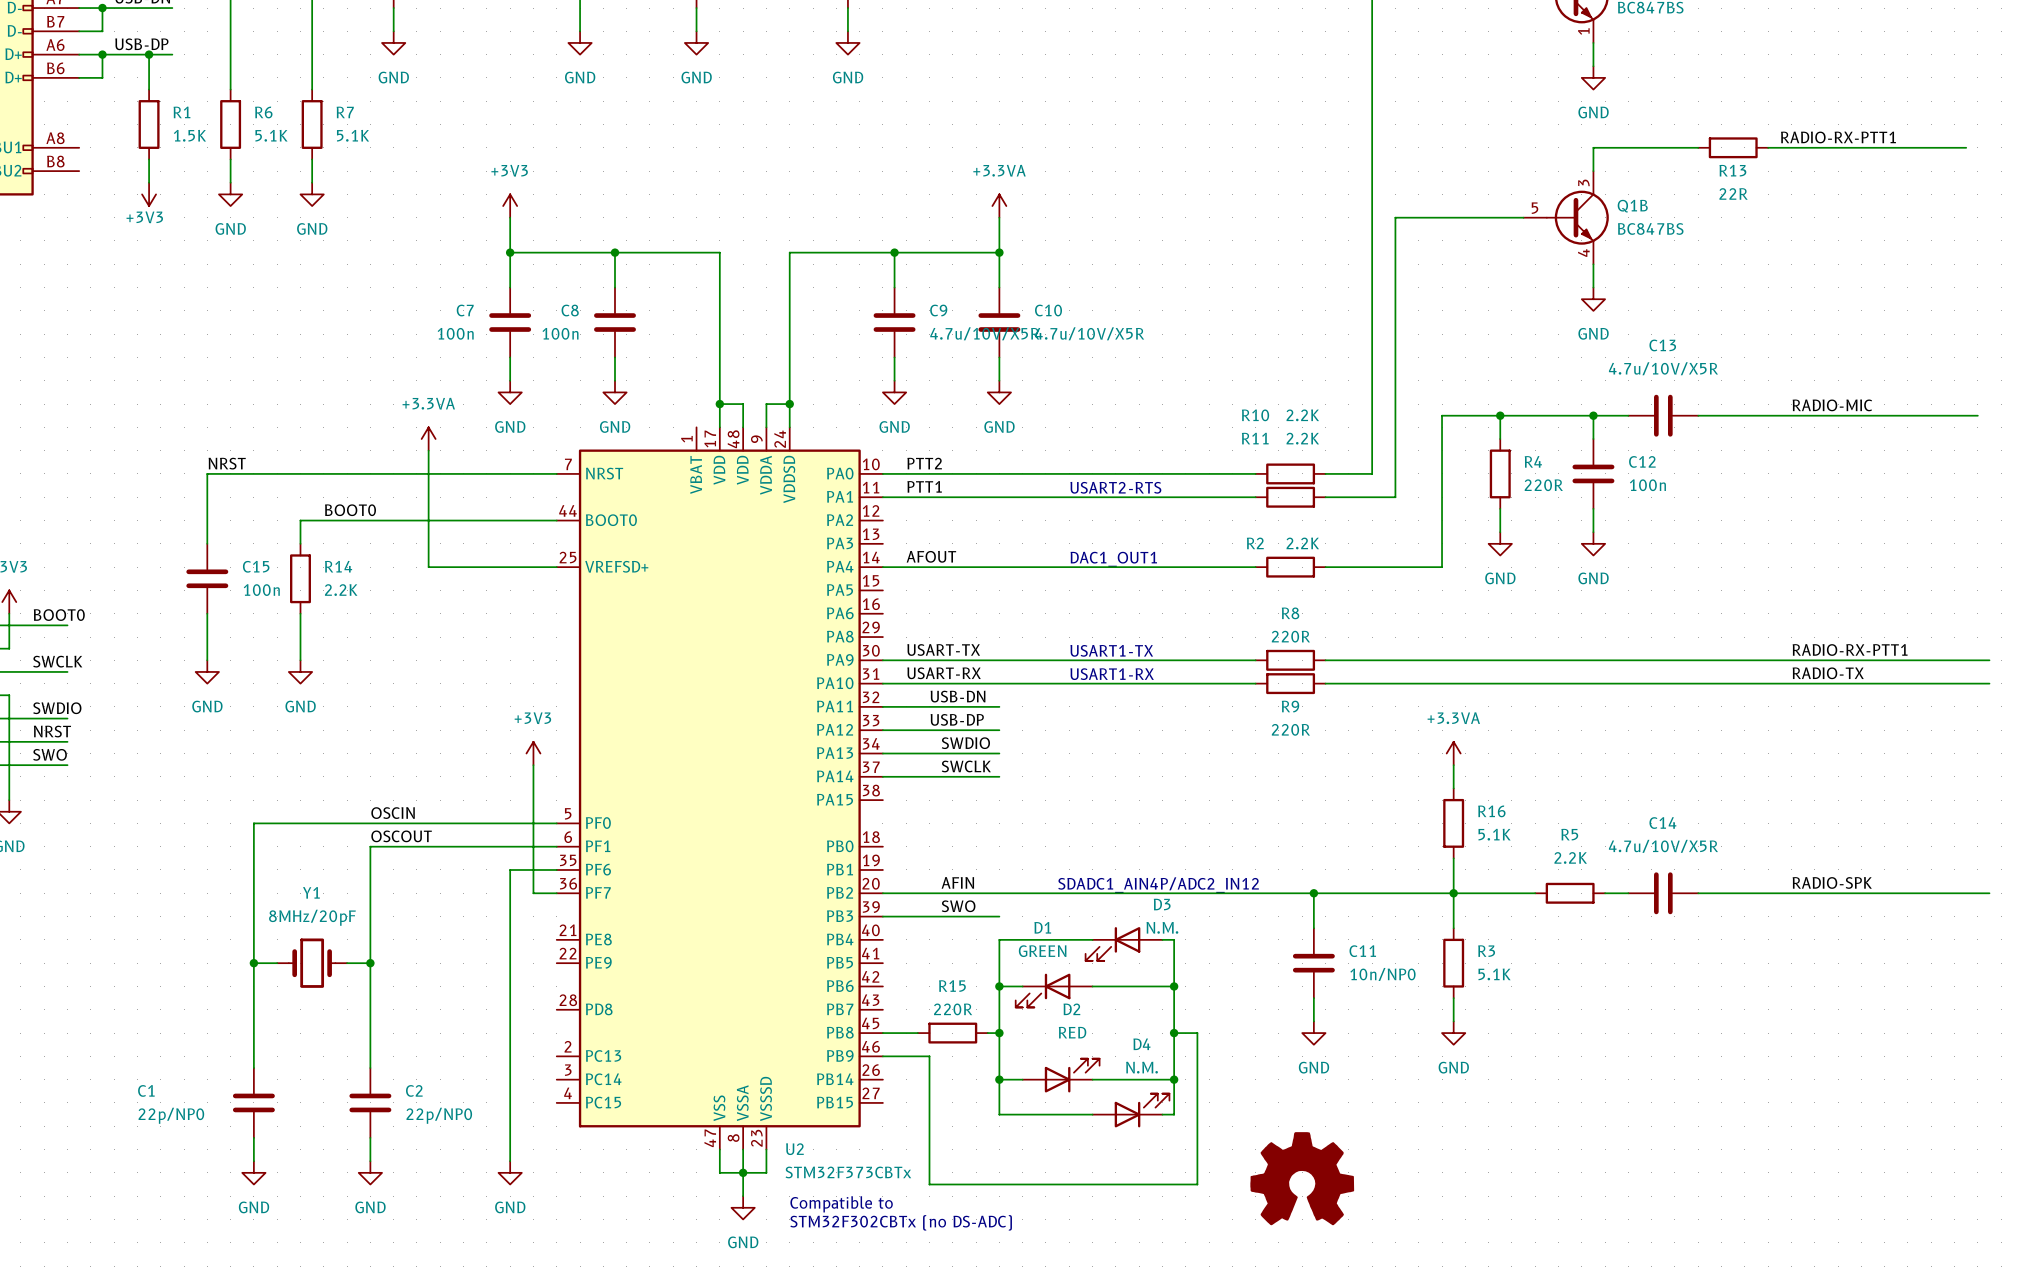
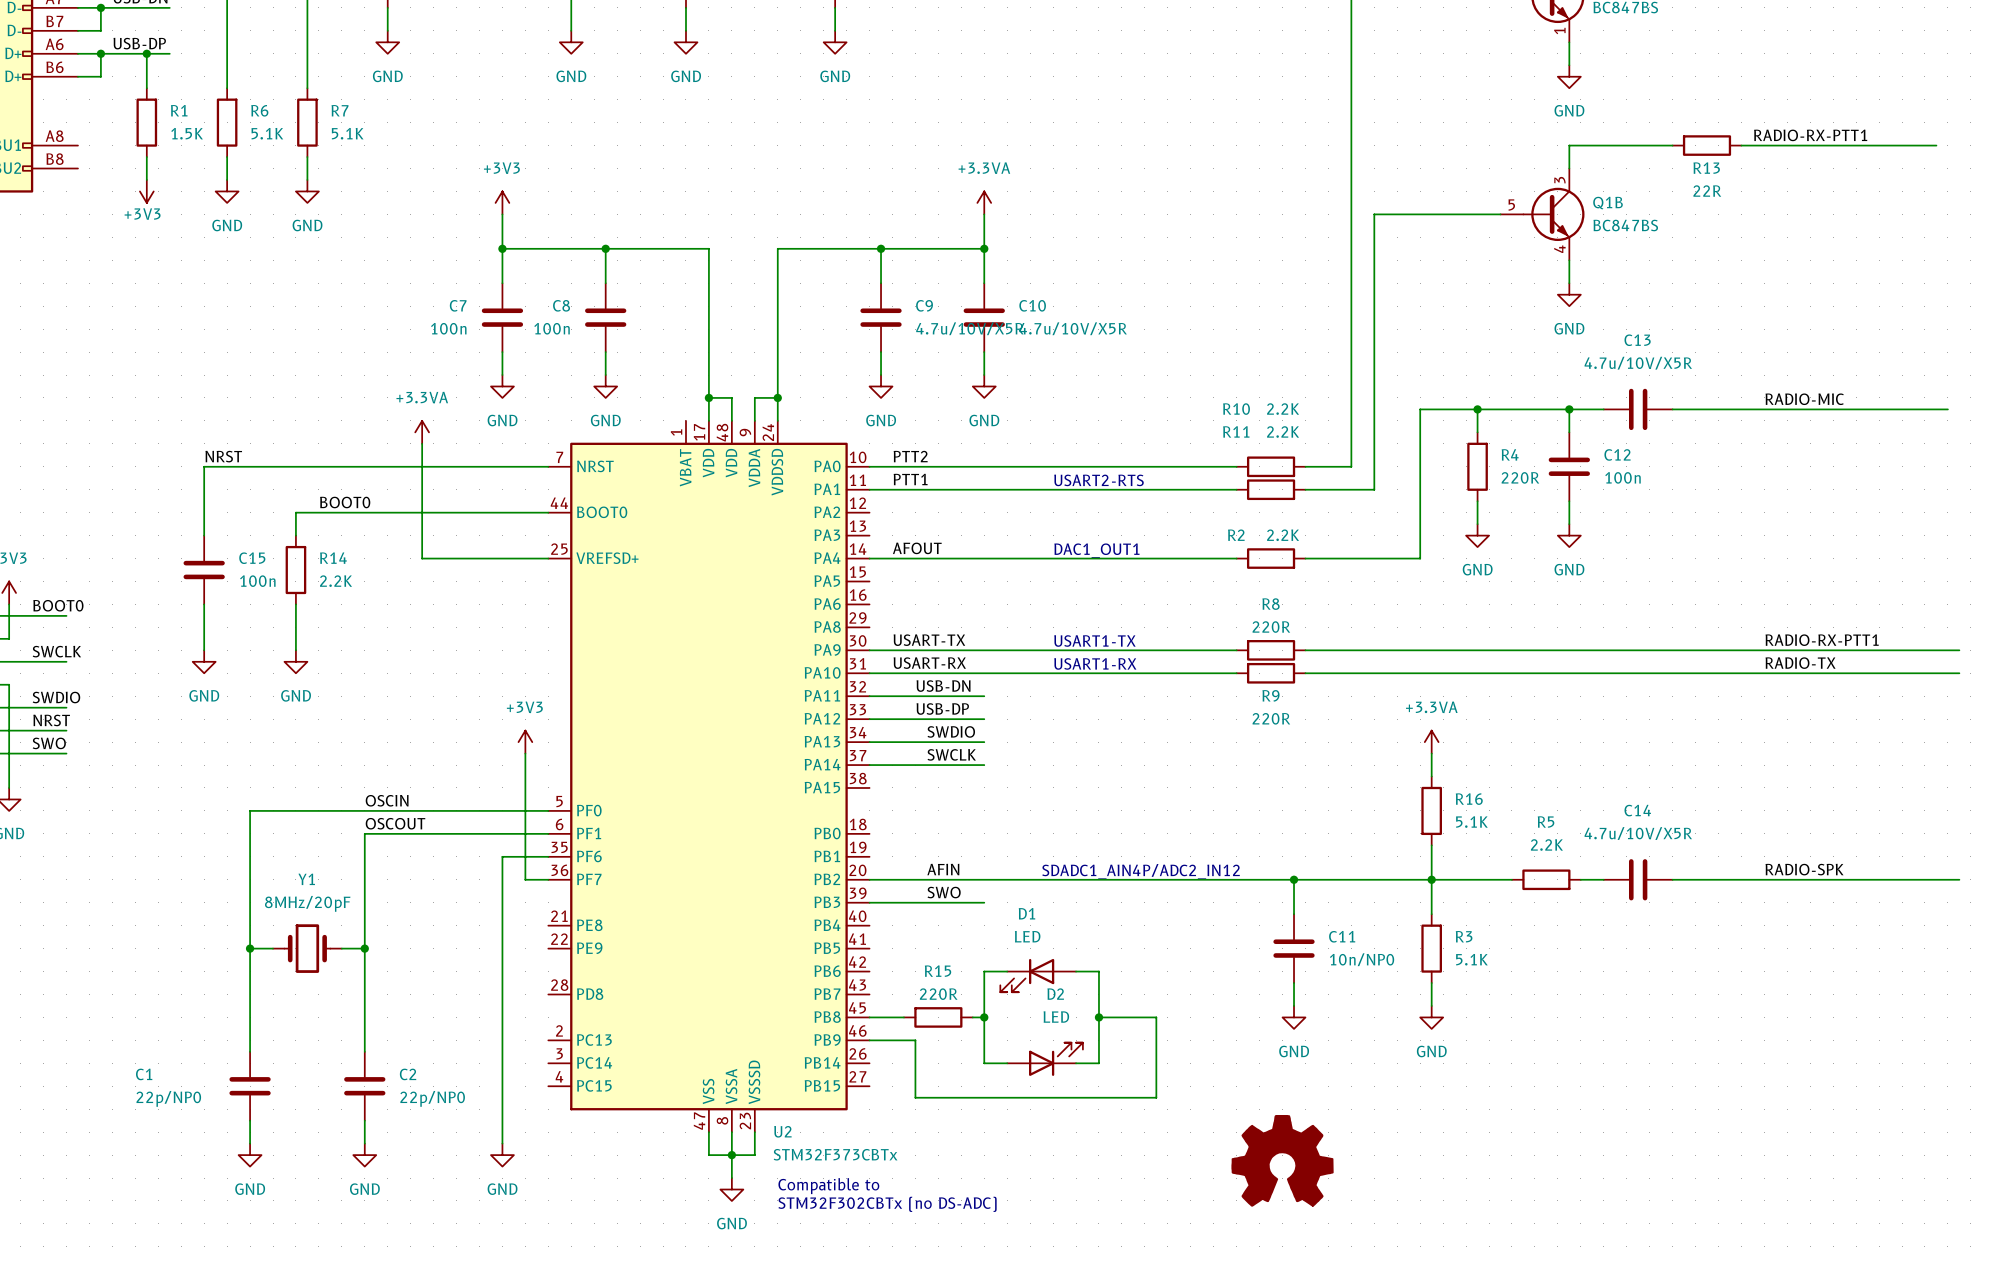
wire: (1092, 939) (999, 939) (999, 986) -> none
wire: (1162, 939) (1174, 939) (1174, 1033) (1197, 1033) (1197, 1184) (929, 1184) (929, 1114) -> none
D3: N.M. (1124, 943) -> none
D1 value: GREEN (1042, 951) -> LED (1027, 936)
junction: (999, 986) -> none
wire: (1115, 986) (1174, 986) -> (1098, 971) (1098, 1063)
junction: (1174, 986) -> none
D2 value: RED (1072, 1032) -> LED (1056, 1017)
junction: none -> (1098, 1017)
junction: (1174, 1033) -> none
wire: (999, 1079) (999, 1114) -> (915, 1097) (984, 1097)
junction: (999, 1079) -> none
wire: (1115, 1079) (1174, 1079) -> (1098, 1017) (1156, 1017)
junction: (1174, 1079) -> none
D4: N.M. (1131, 1110) -> none

